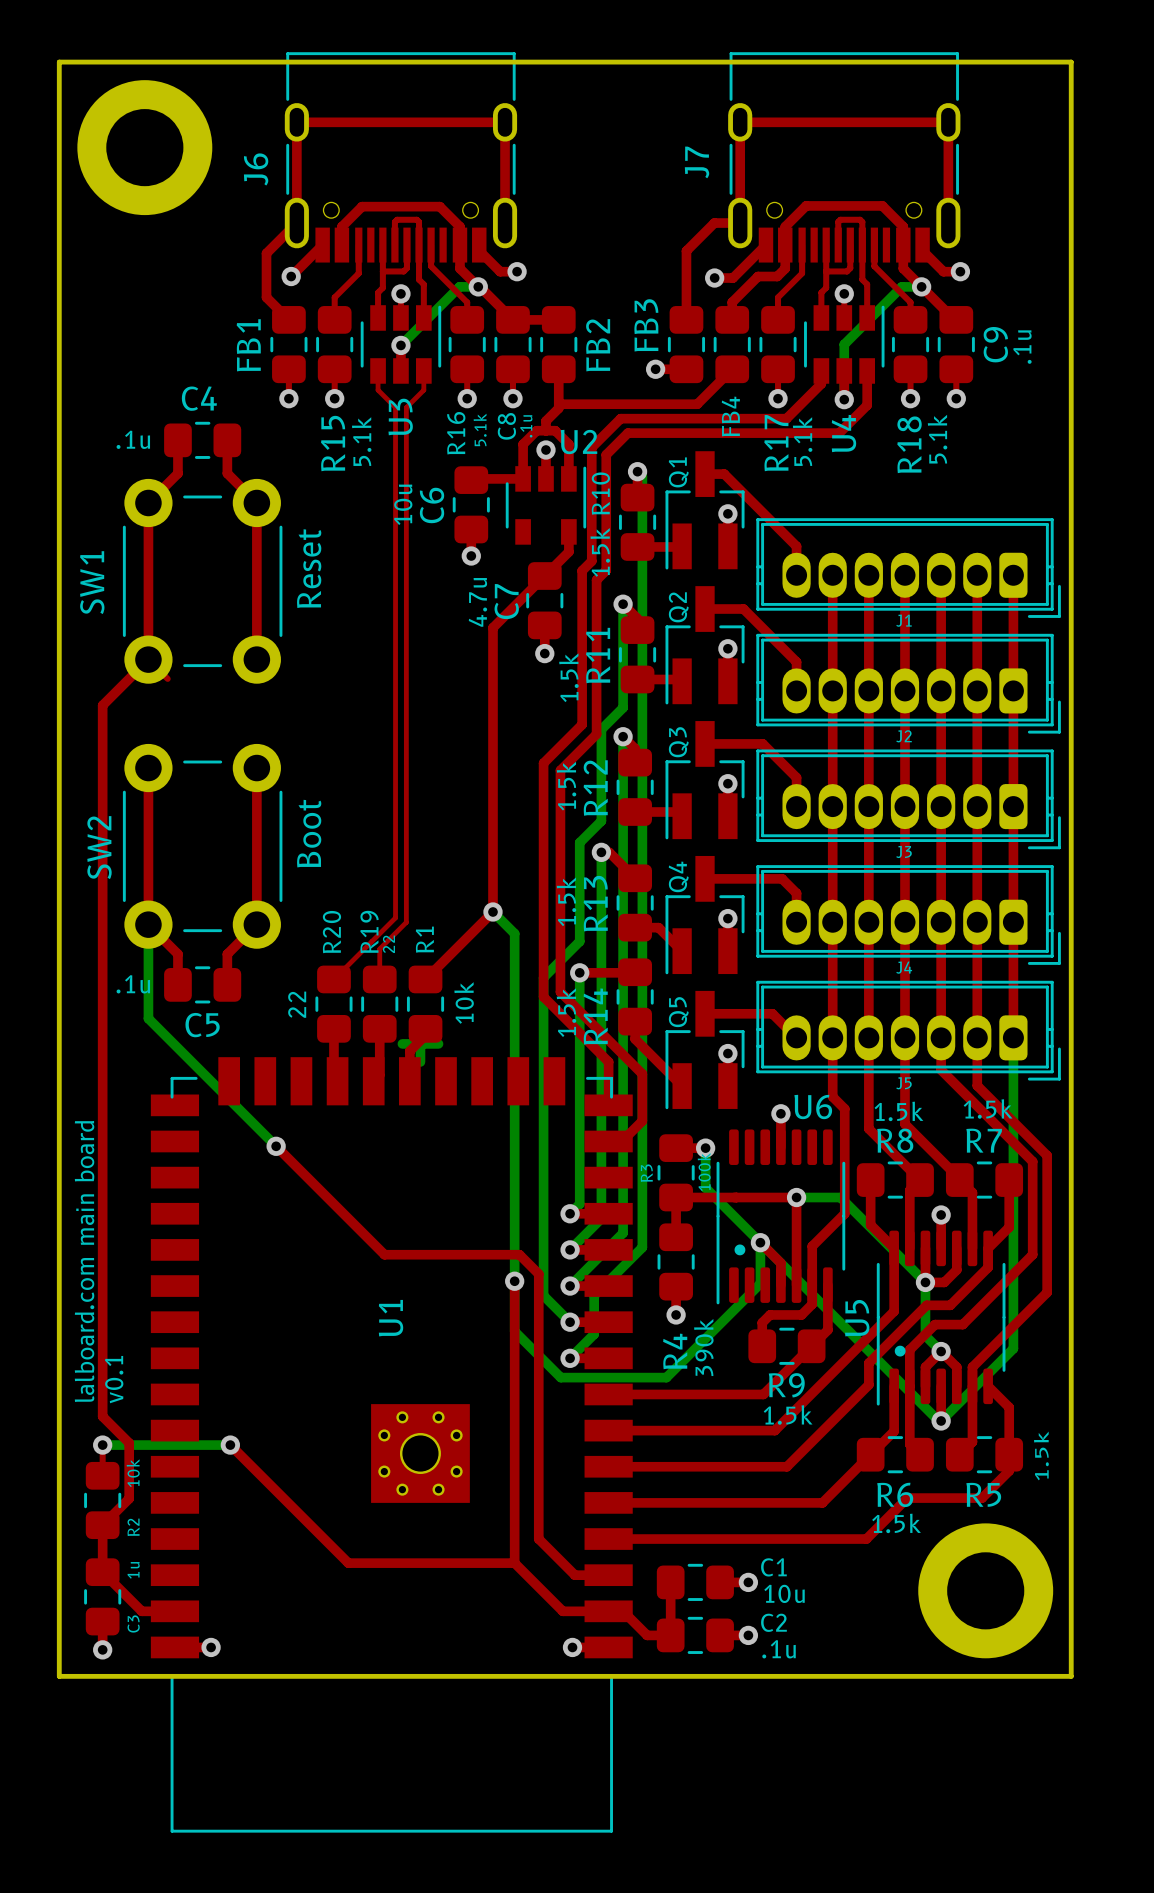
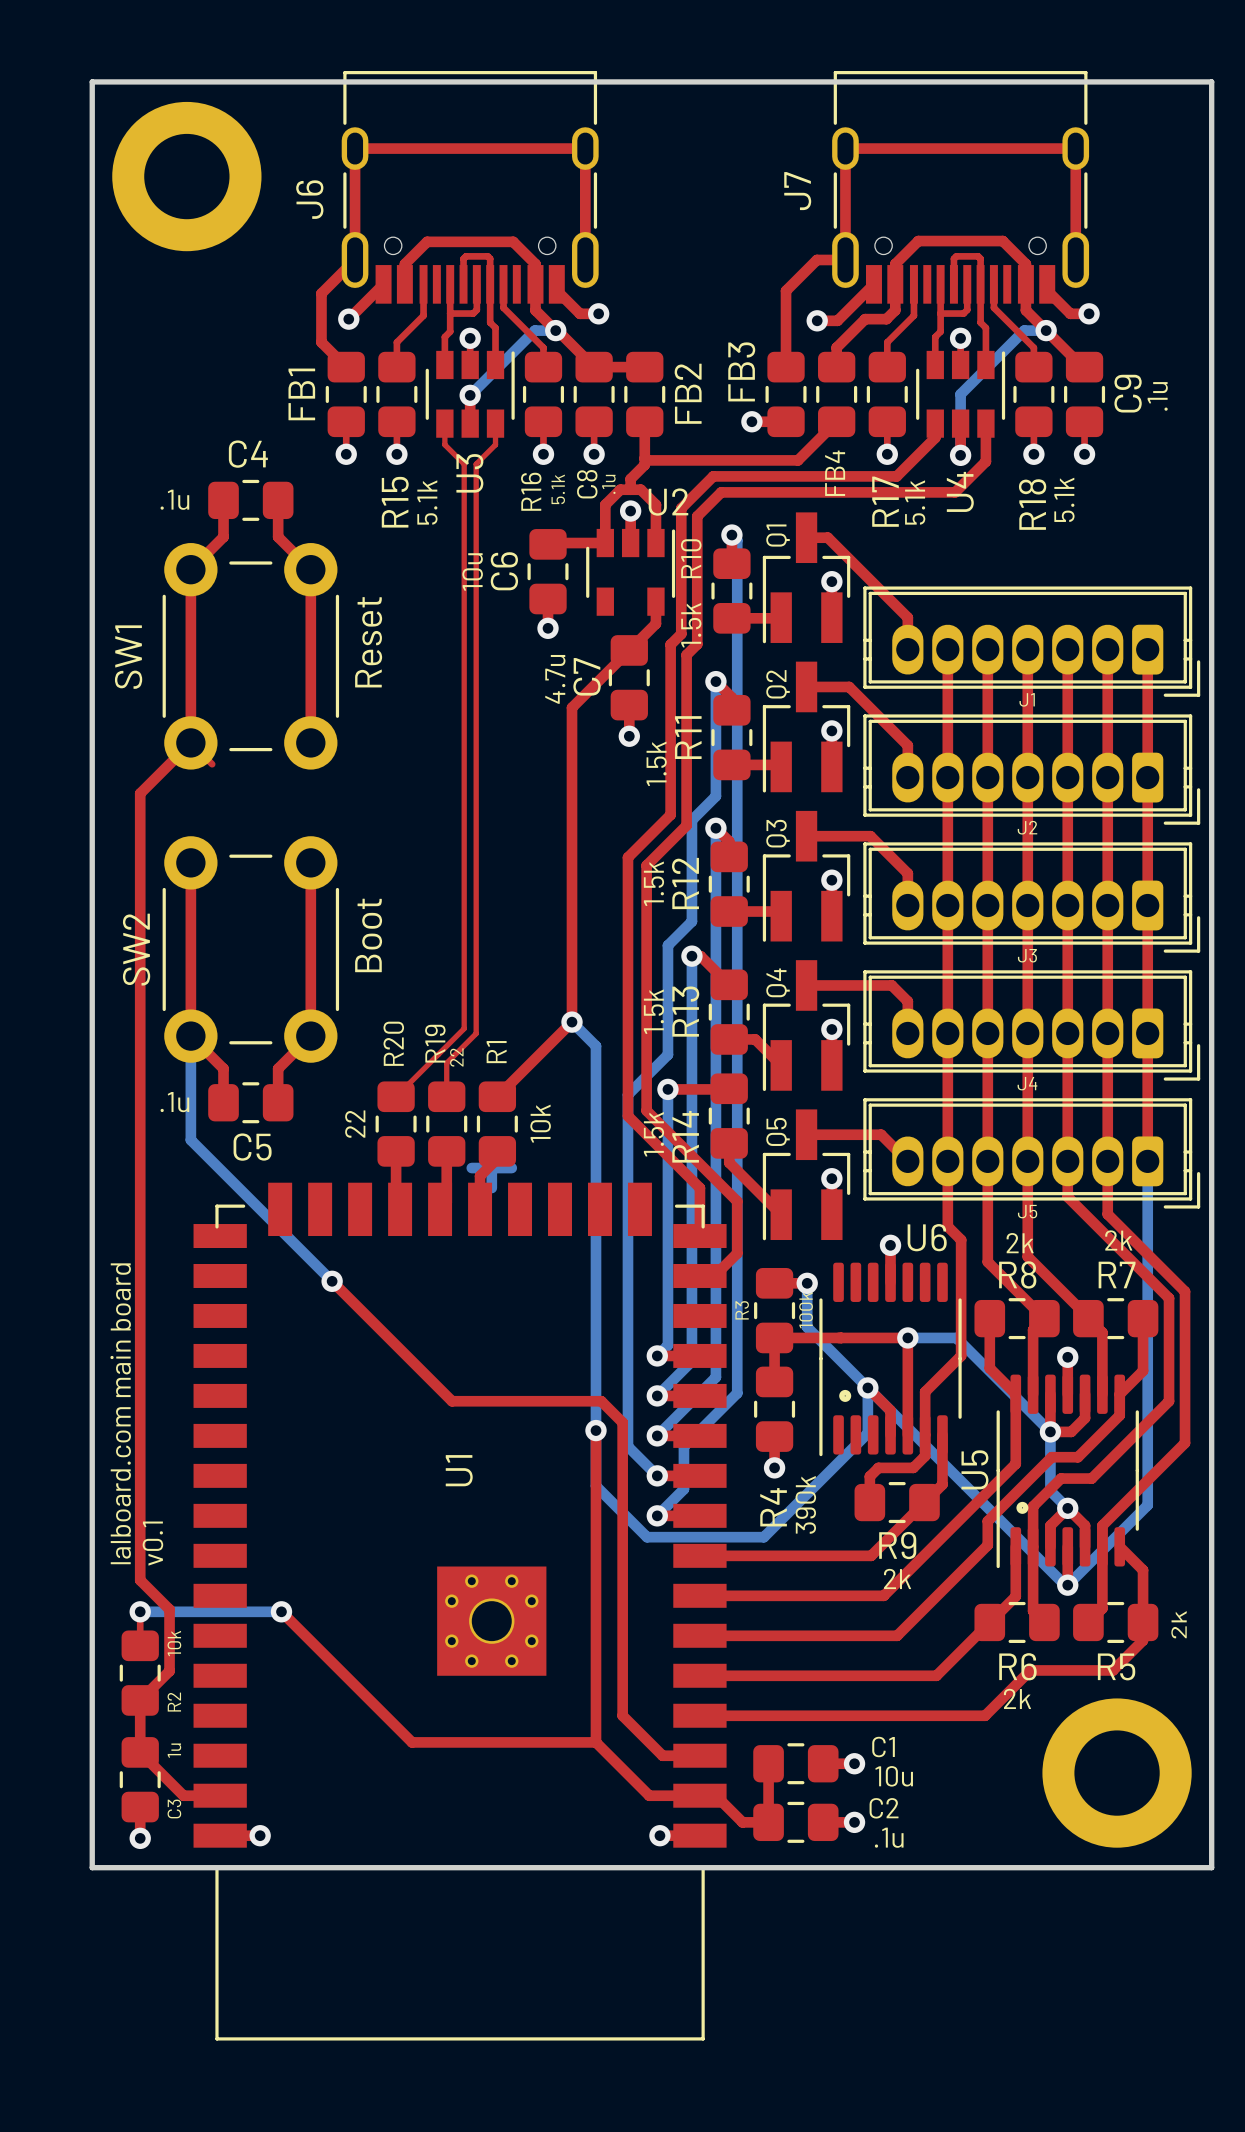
R7 value: 1.5k (988, 1108) -> 2k (1118, 1240)
R8 value: 1.5k (898, 1111) -> 2k (1020, 1243)
R9 value: 1.5k (788, 1414) -> 2k (897, 1578)
R5 value: 1.5k (1041, 1455) -> 2k (1179, 1624)
R6 value: 1.5k (896, 1523) -> 2k (1017, 1698)

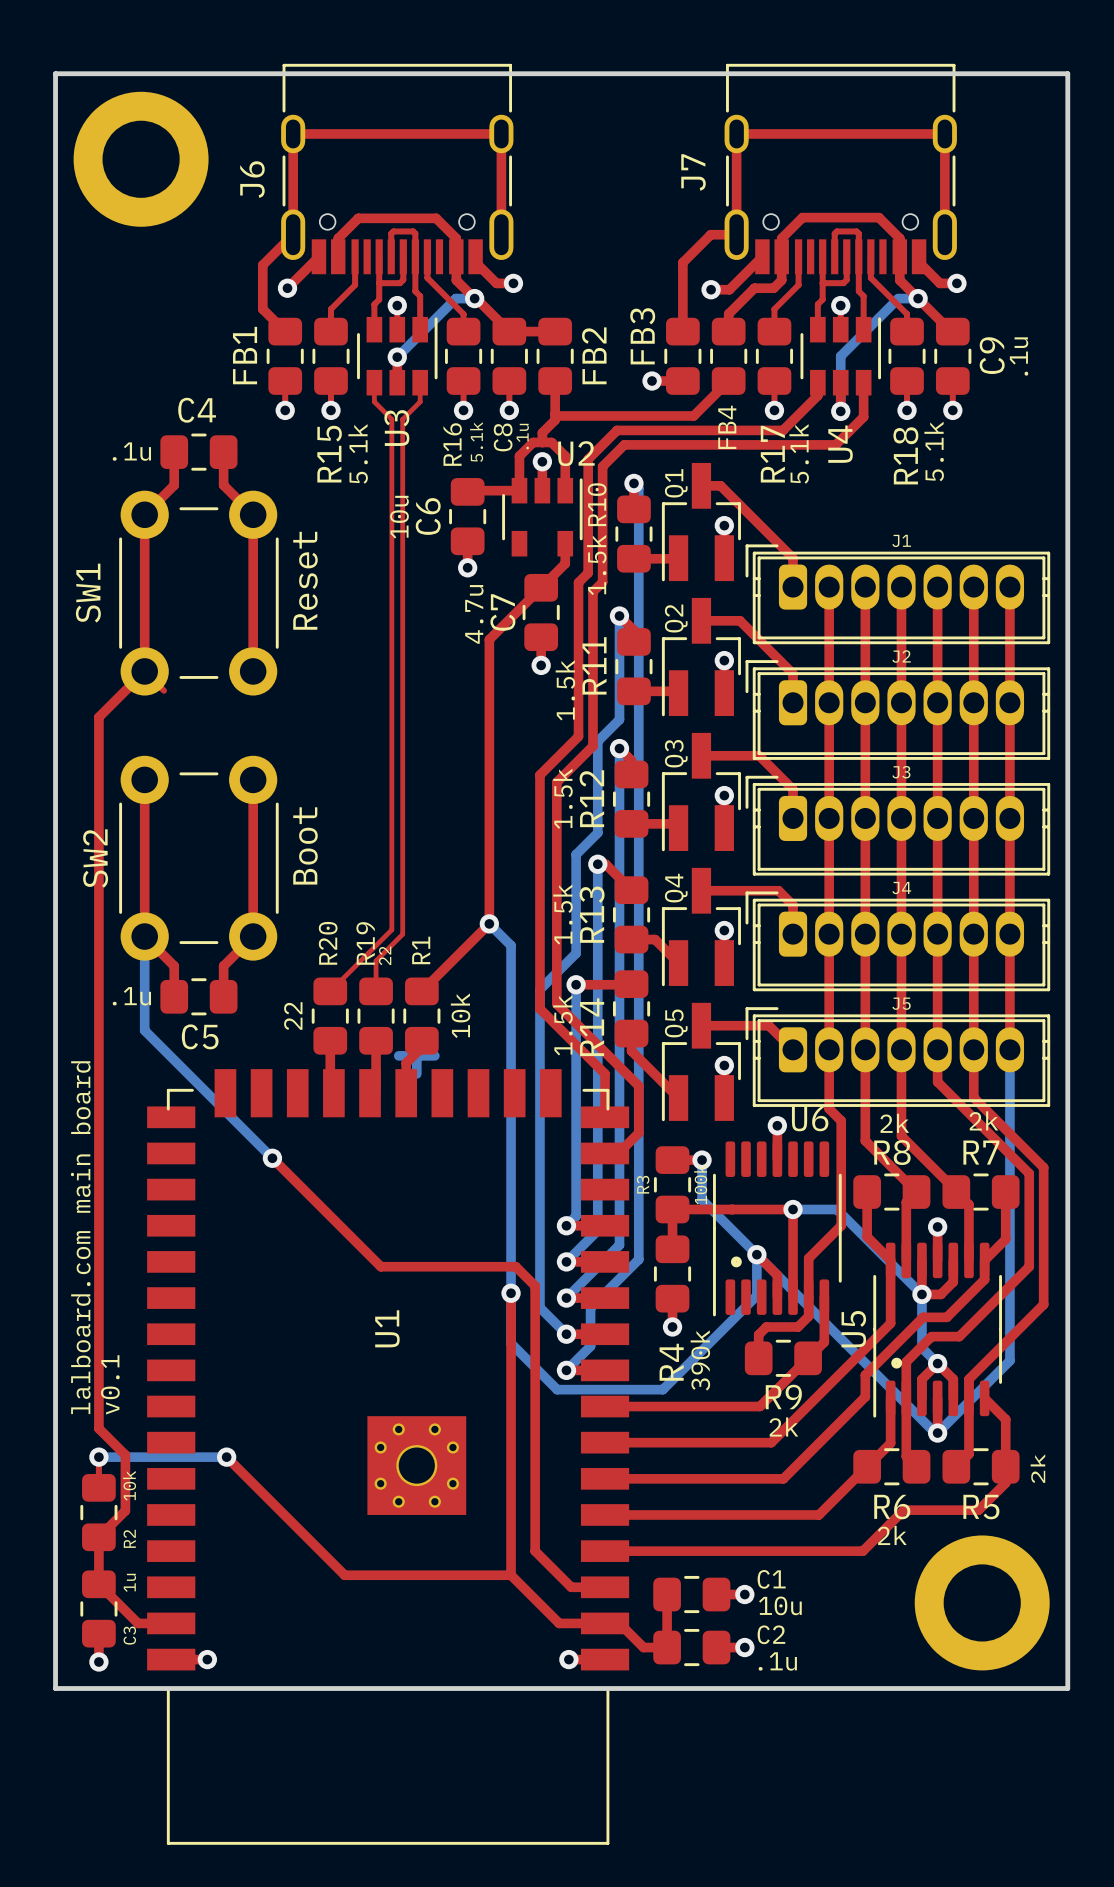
J1 rotation: 0° (1031, 641) -> 180° (897, 594)
J2 rotation: 0° (1031, 769) -> 180° (897, 710)
J3 rotation: 0° (1031, 897) -> 180° (897, 825)
J4 rotation: 0° (1031, 1025) -> 180° (897, 941)
J5 rotation: 0° (1031, 1153) -> 180° (897, 1057)

